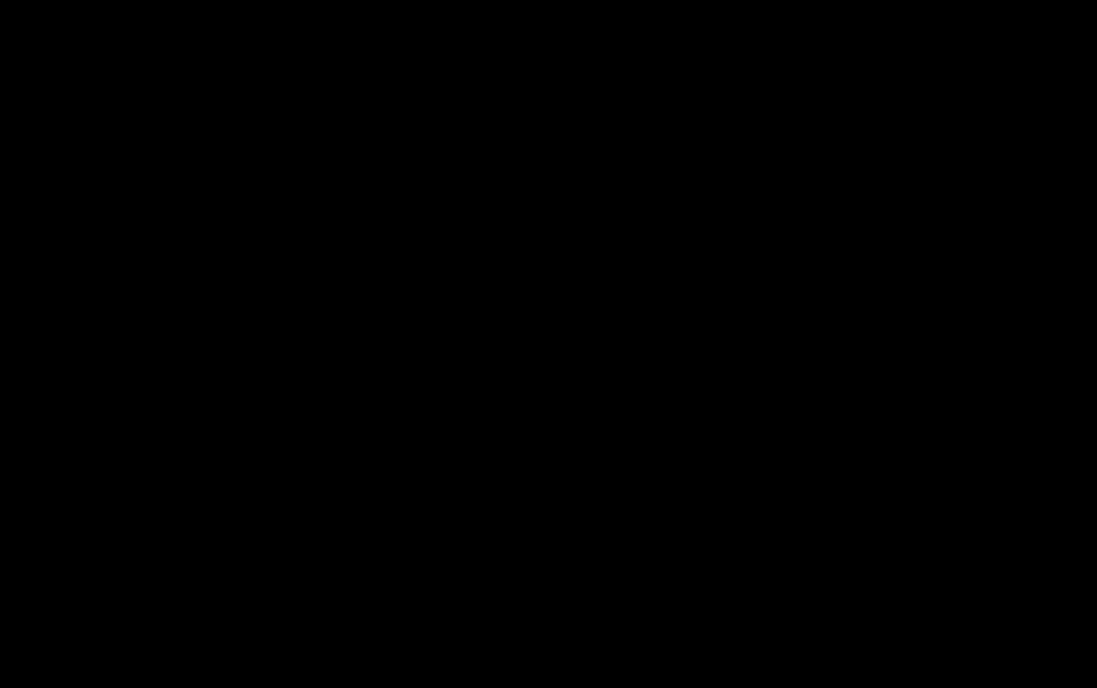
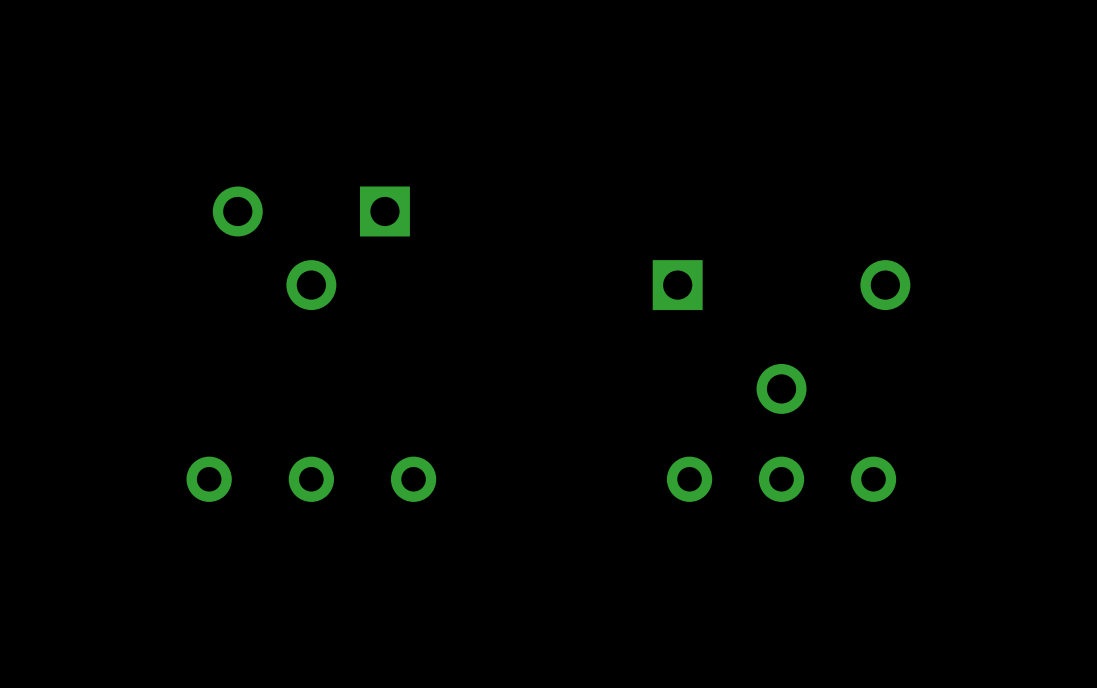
part: none -> (311, 248)
part: none -> (781, 337)
part: none -> (209, 479)
part: none -> (311, 479)
part: none -> (413, 479)
part: none -> (689, 479)
part: none -> (781, 479)
part: none -> (873, 479)

